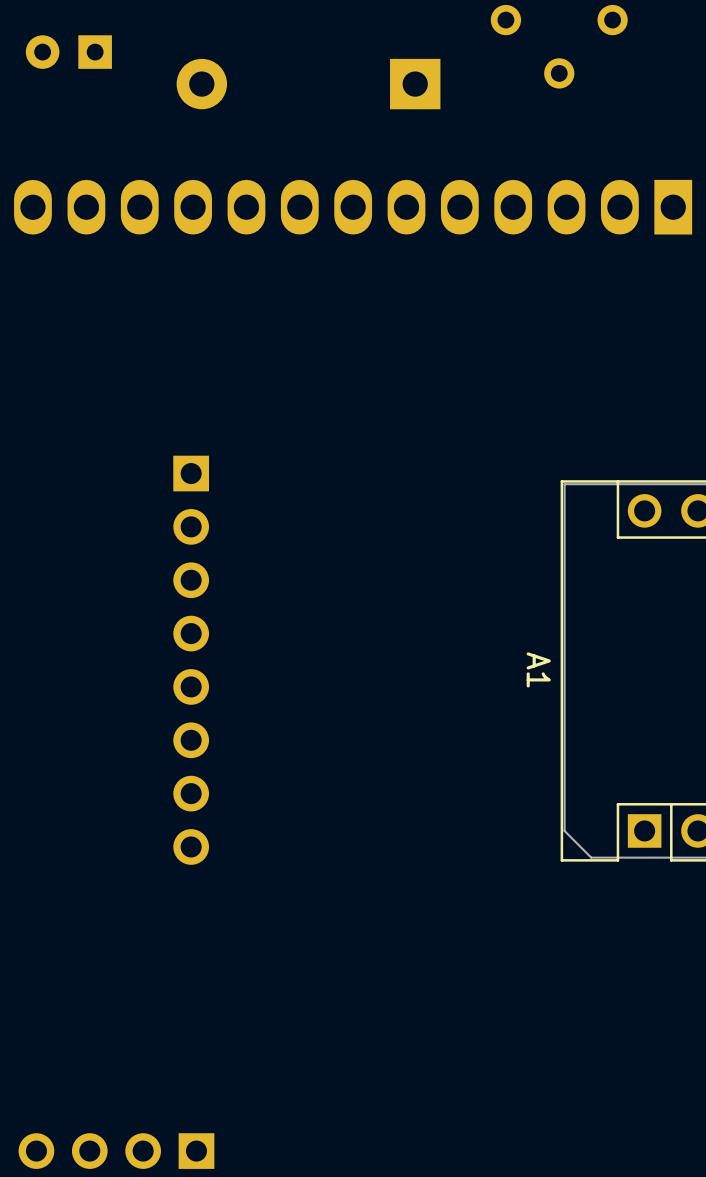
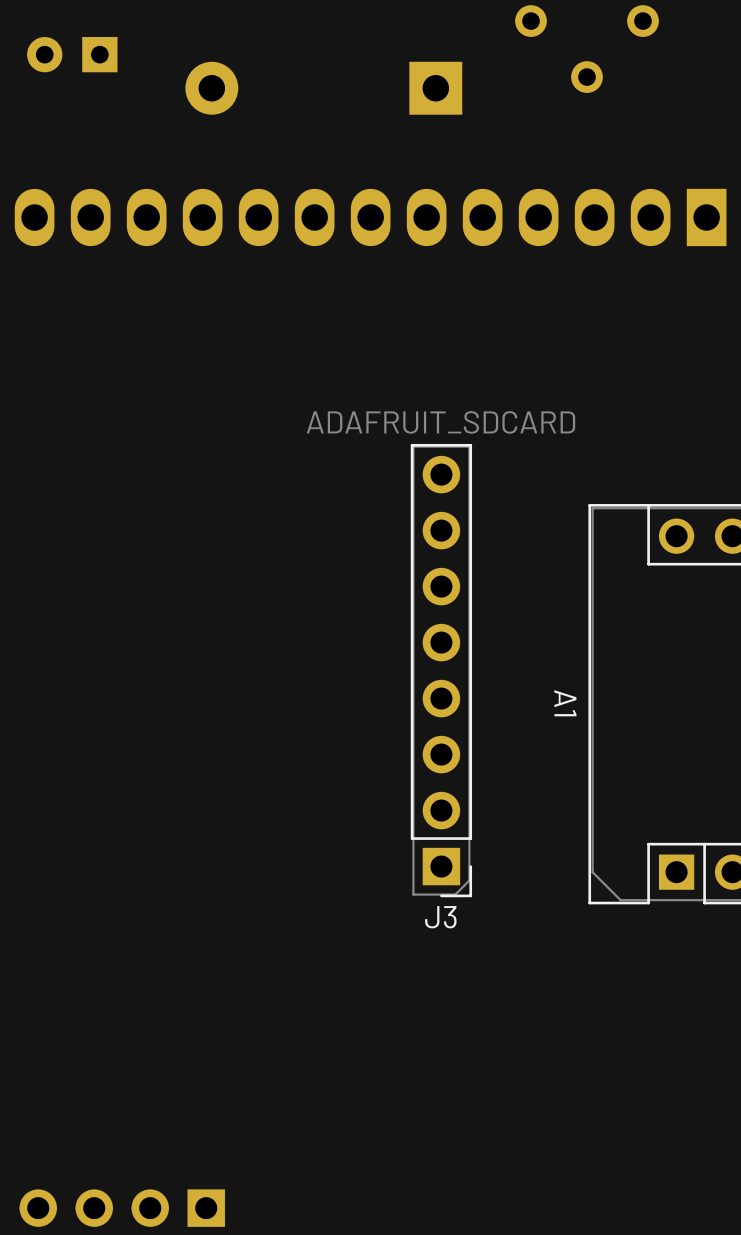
J3 side: top (191, 660) -> bottom (441, 670)

